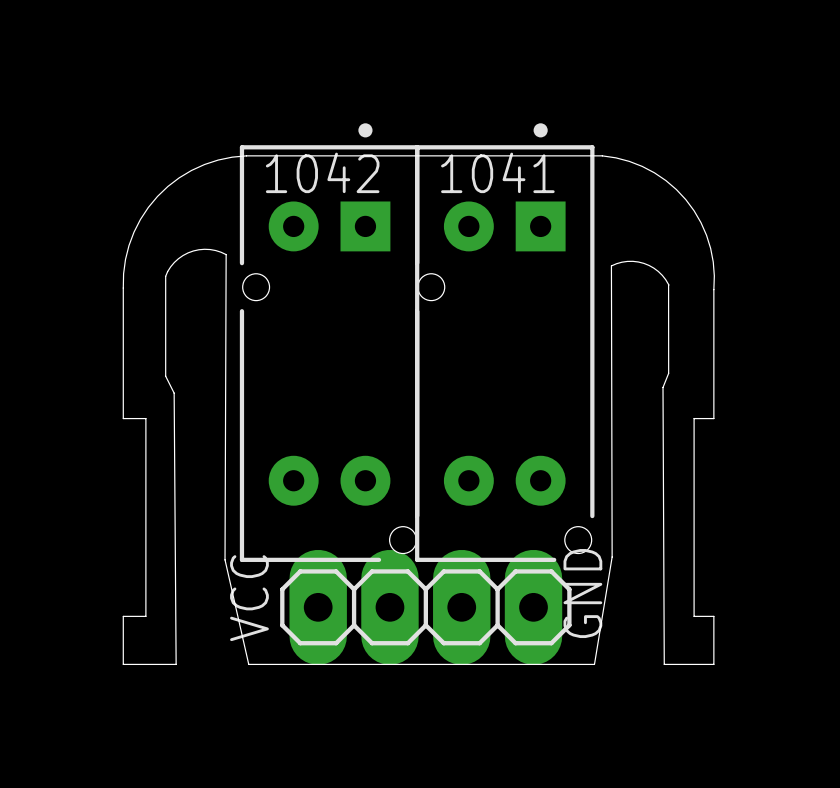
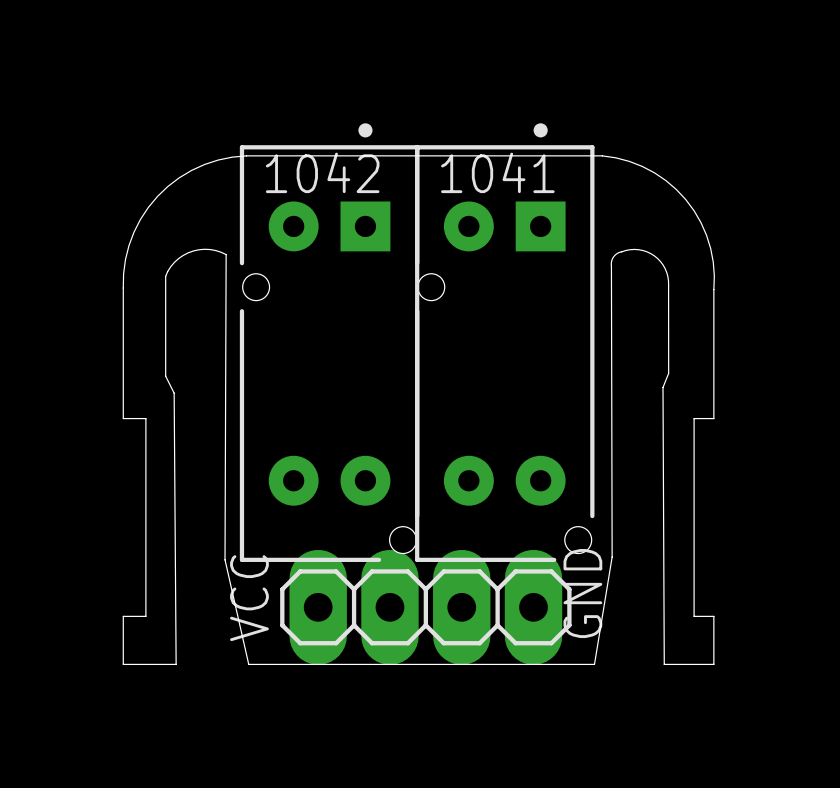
board edge: (611, 265) (627, 261) (643, 263) (658, 271) (668, 285) -> (611, 265) (612, 258) (618, 252) (634, 249) (646, 251) (657, 258) (663, 265) (666, 272) (668, 285)

